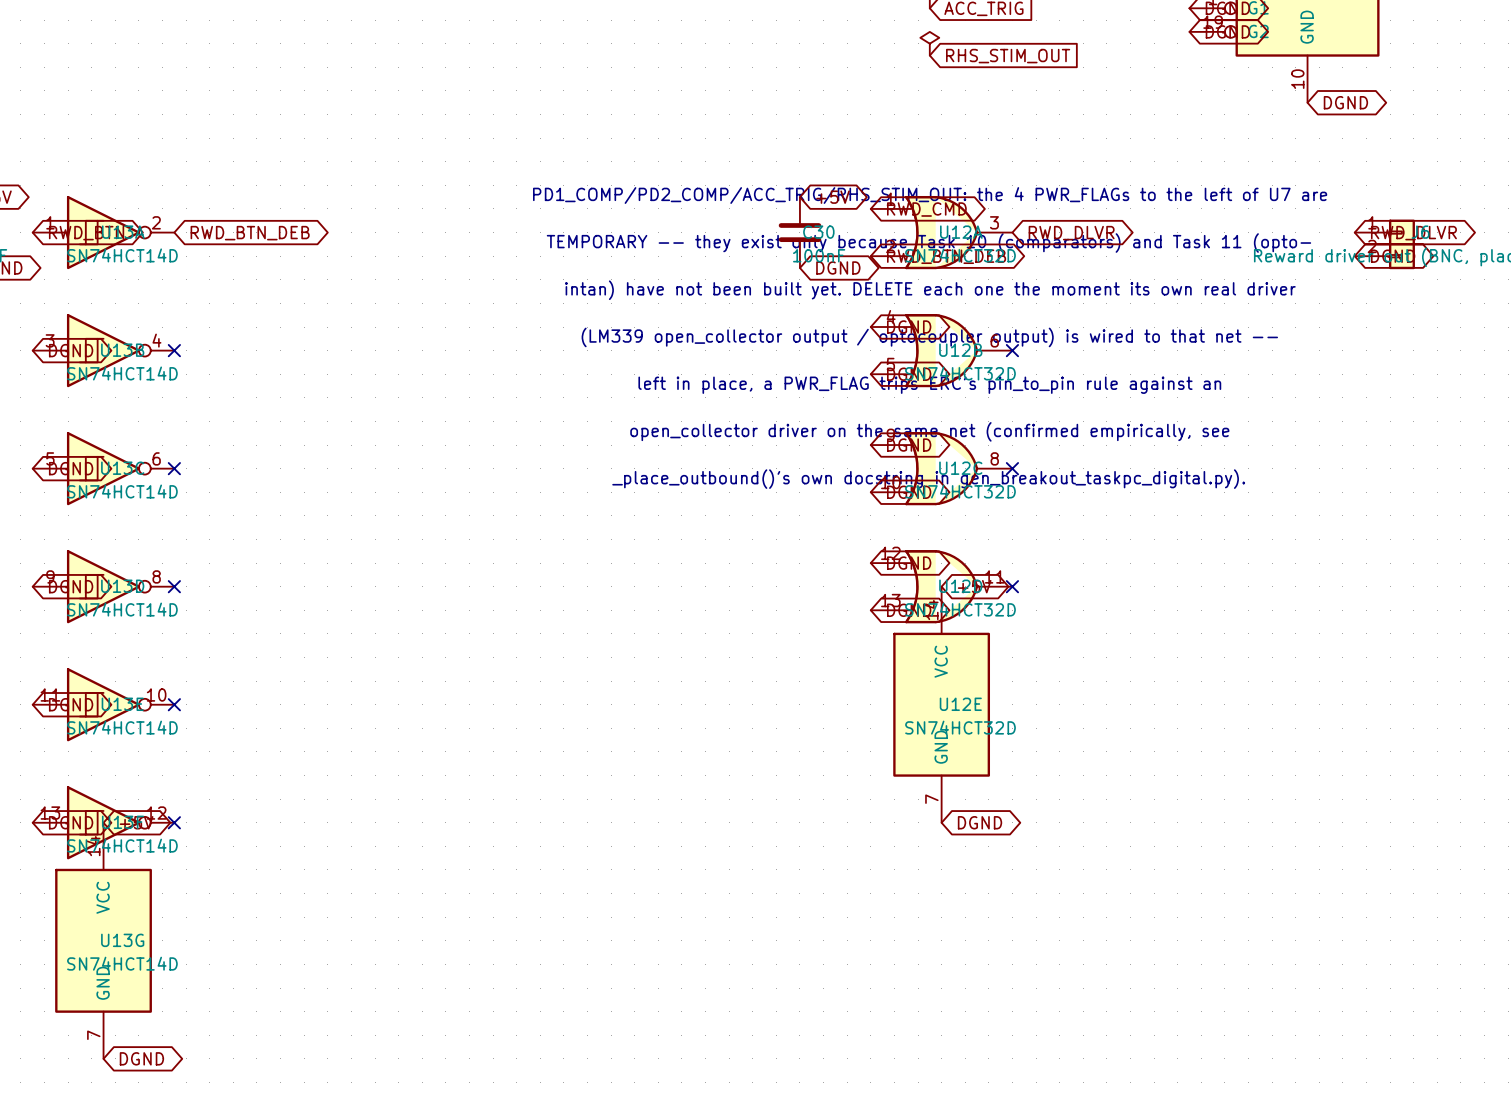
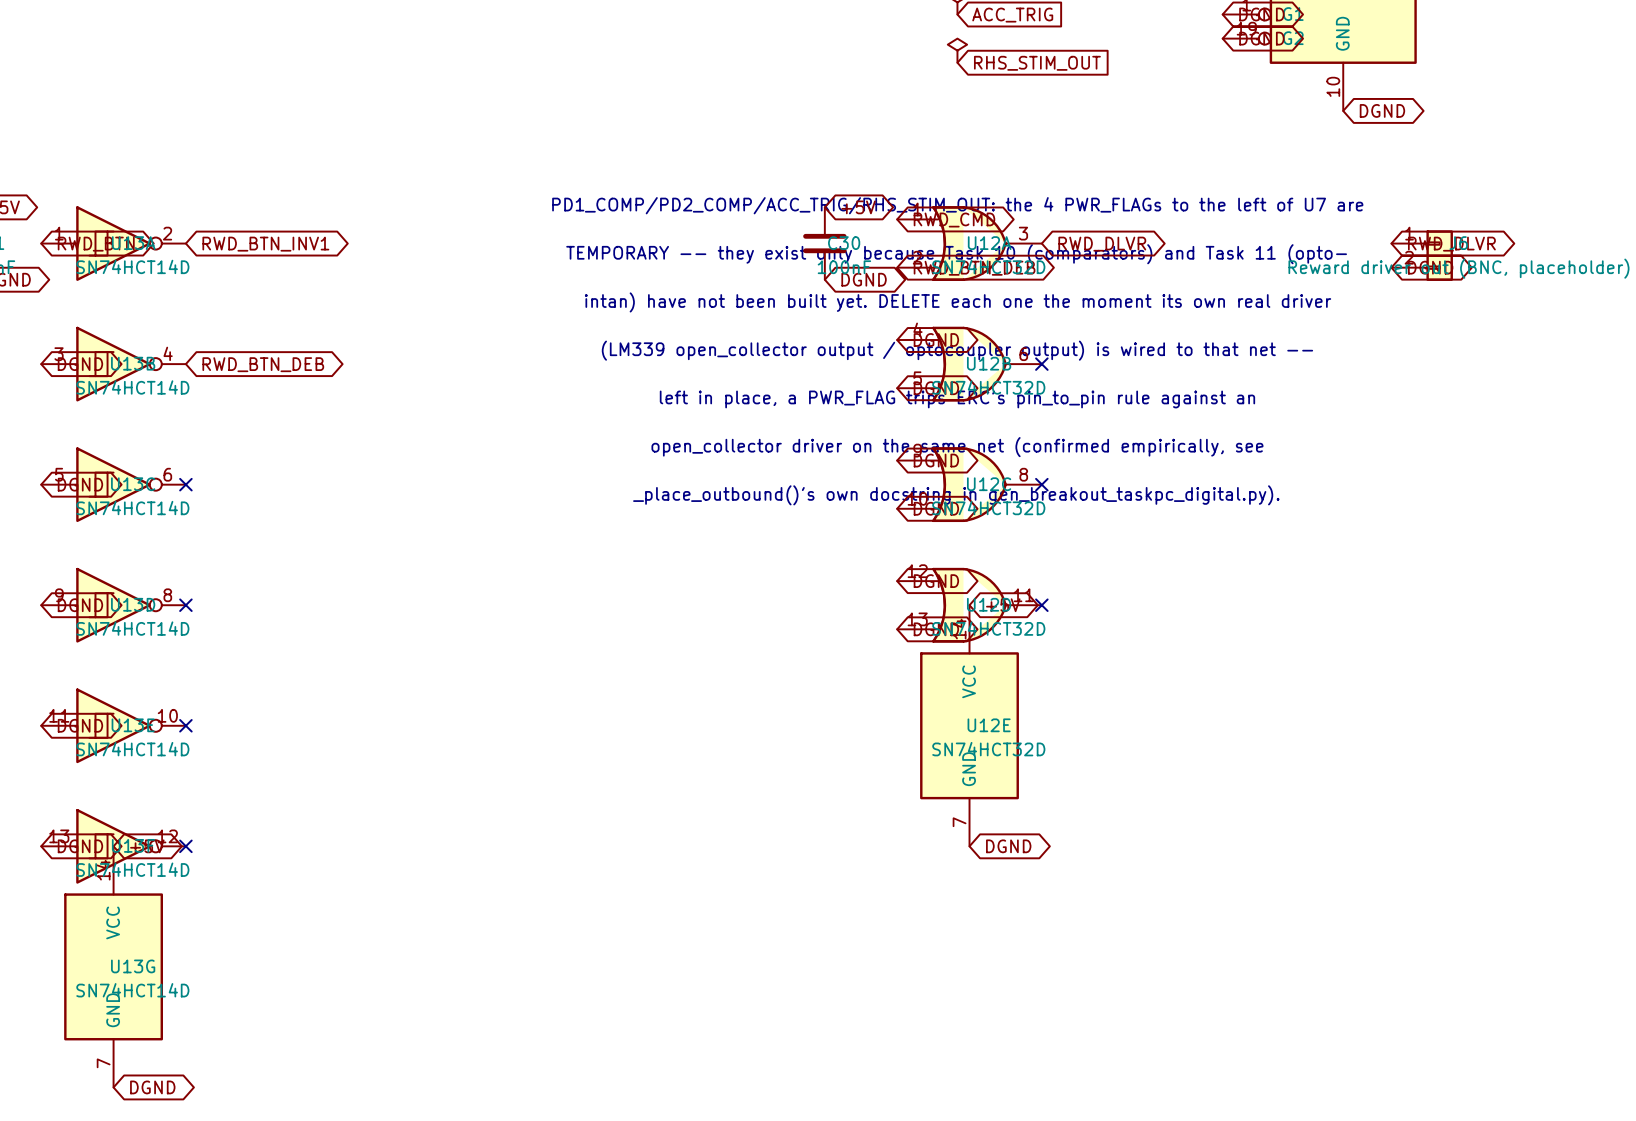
global label: RWD_BTN_DEB (250, 233) -> RWD_BTN_INV1 (265, 244)
no-connect mark: (174, 350) -> none
global label: none -> RWD_BTN_DEB (263, 364)

